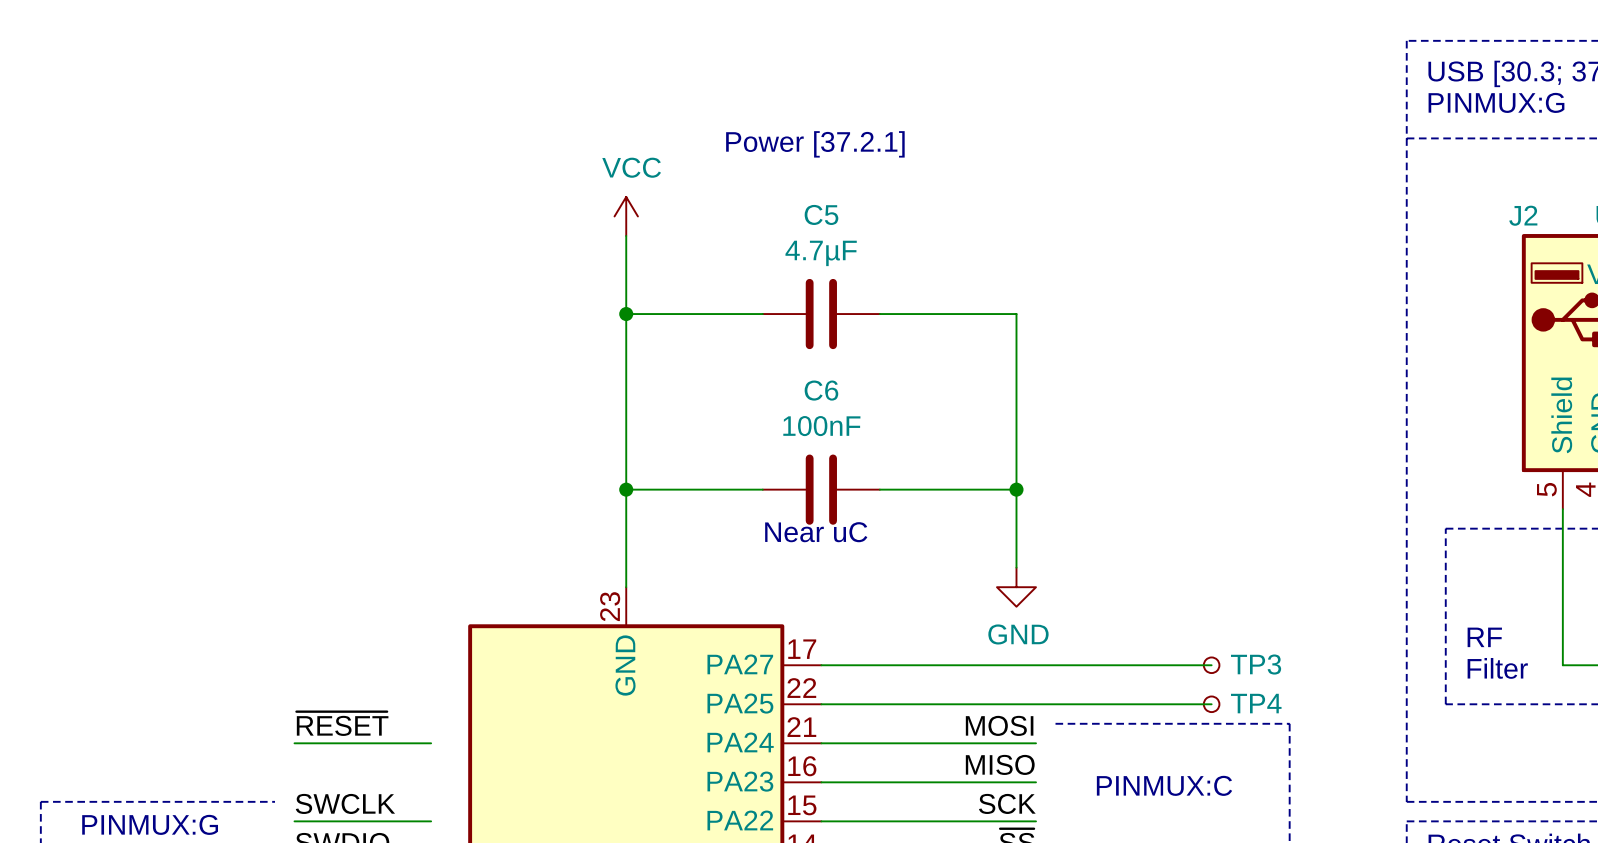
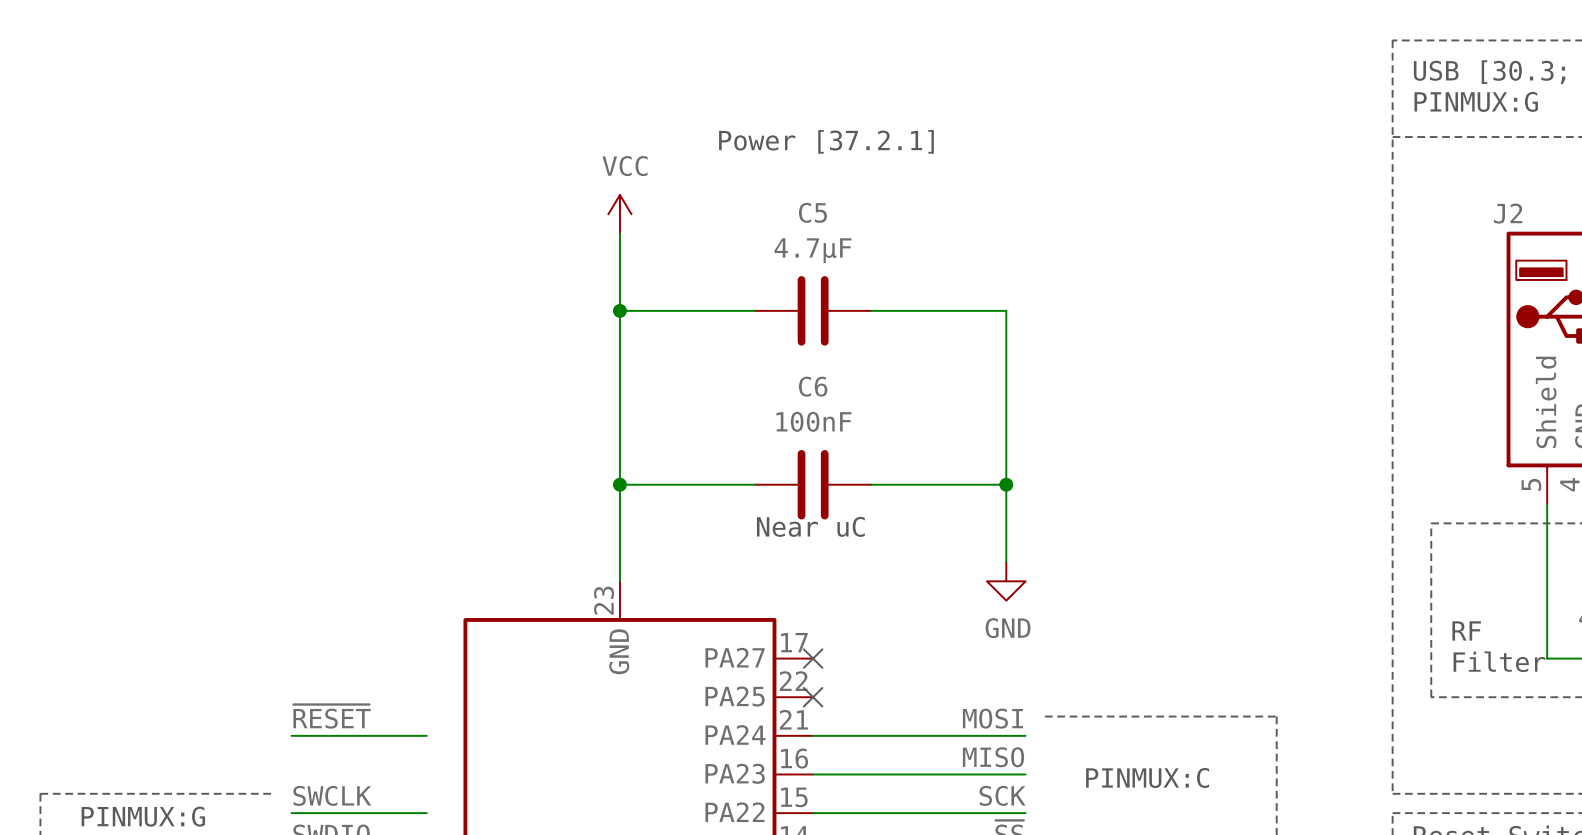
wire: (821, 665) (1211, 665) -> none
no-connect mark: none -> (813, 658)
TP3: (1211, 665) -> none
wire: (821, 704) (1211, 704) -> none
no-connect mark: none -> (813, 697)
TP4: (1211, 704) -> none

